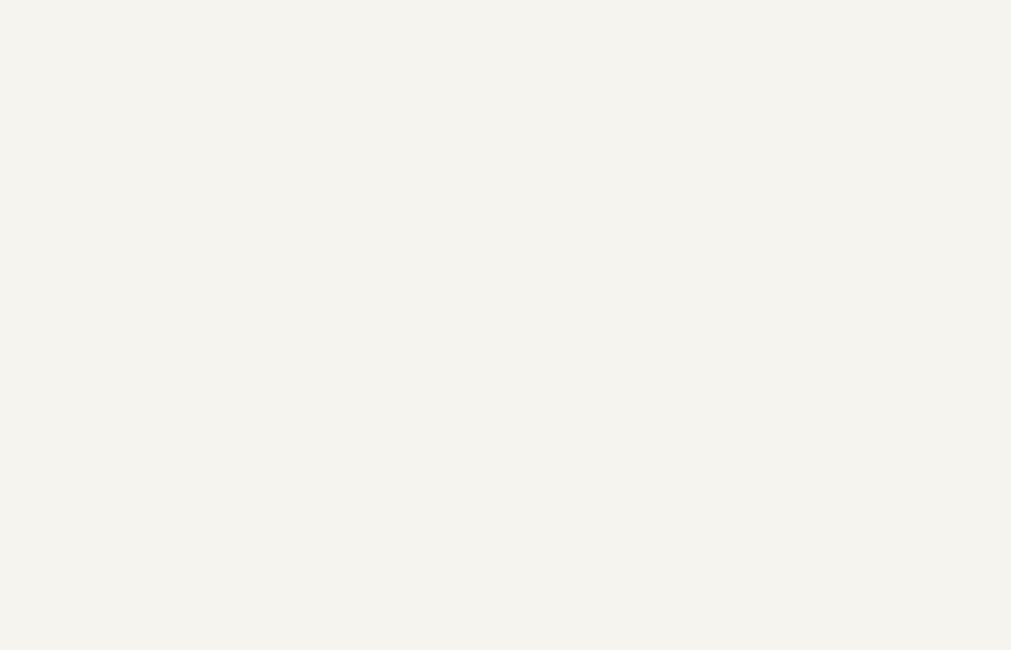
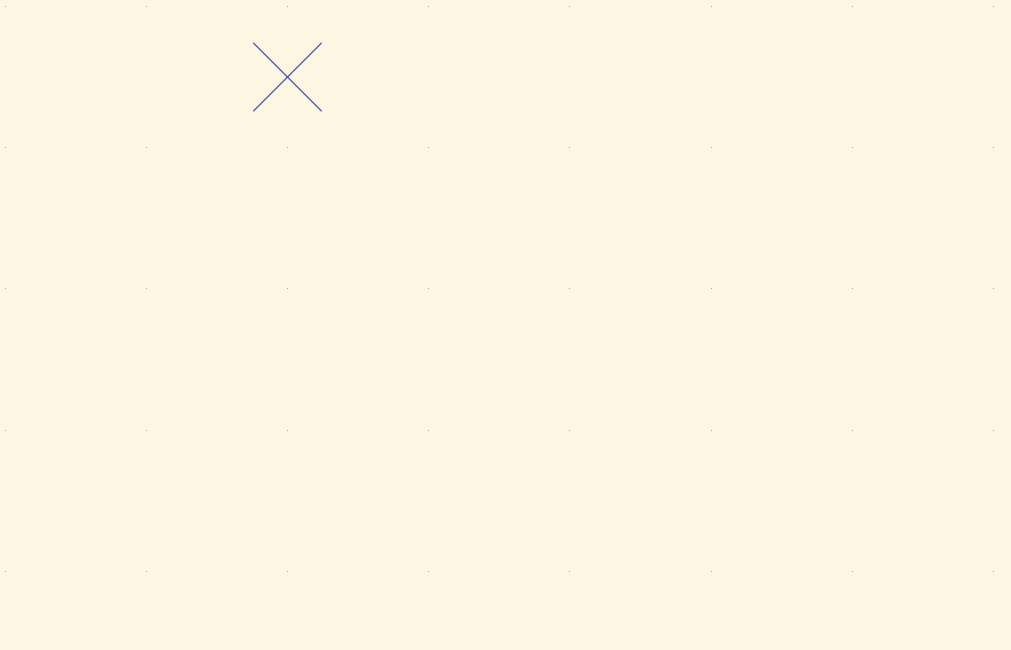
no-connect mark: none -> (287, 77)

